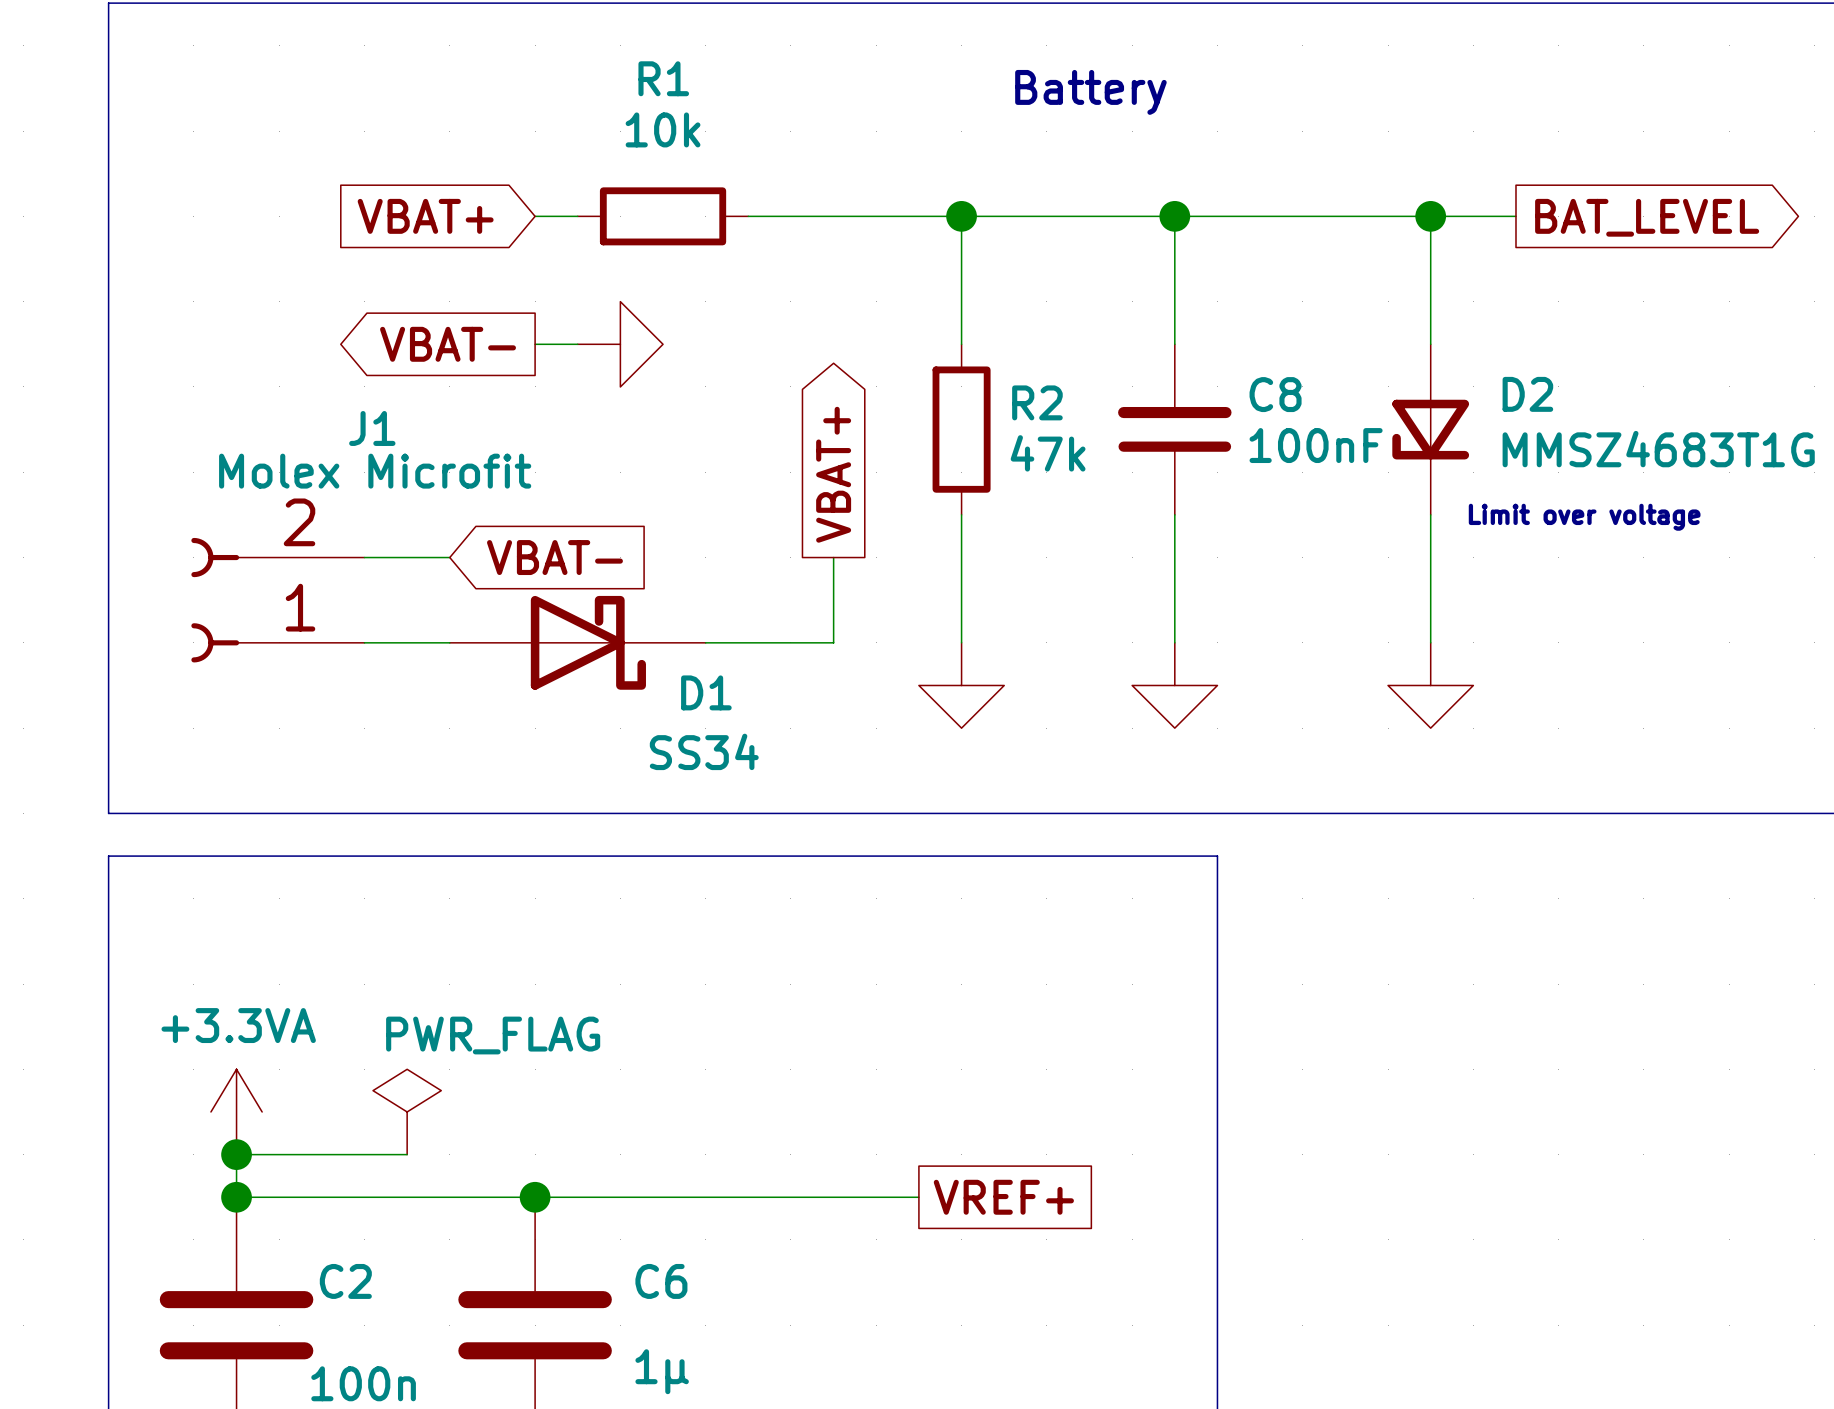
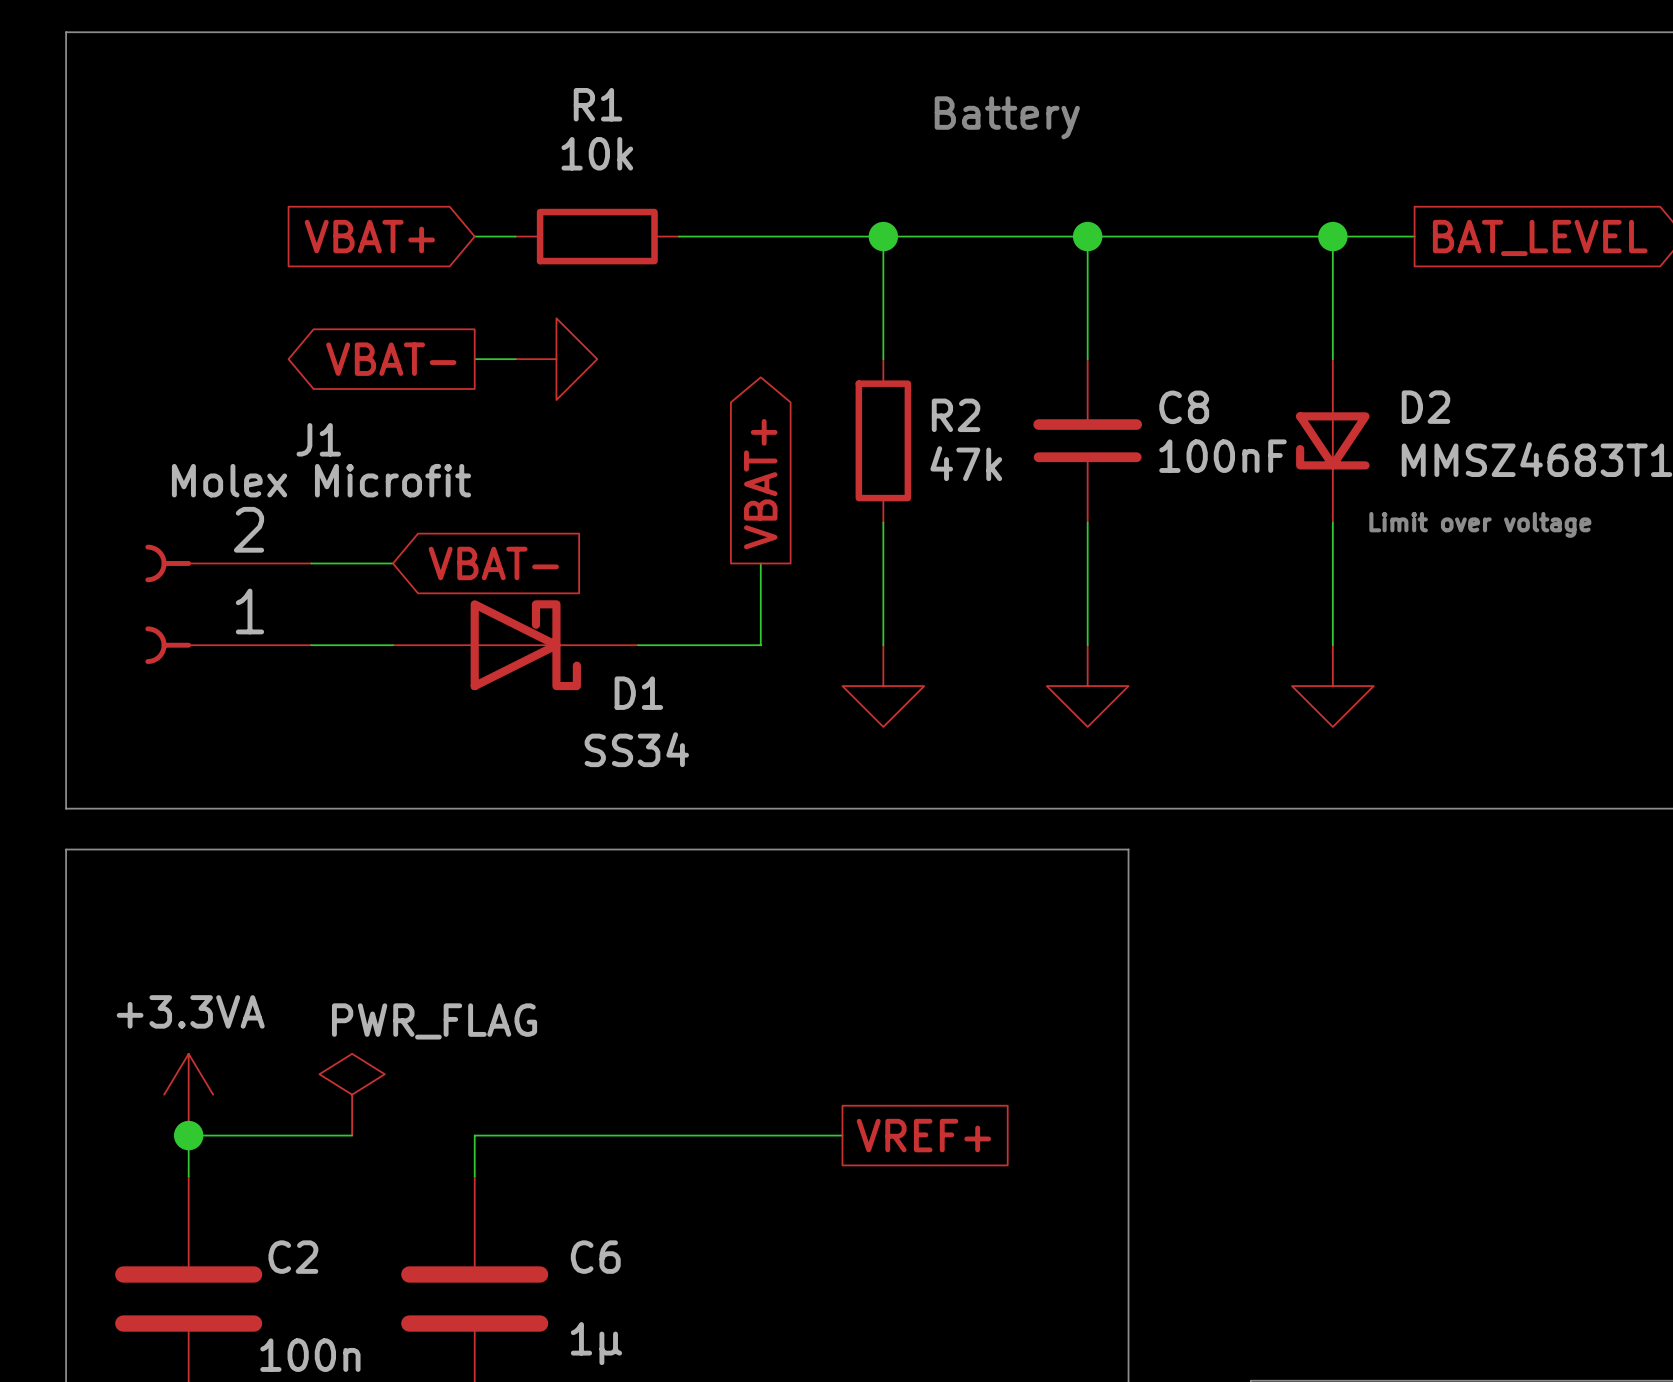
wire: none -> (842, 1135) (474, 1135) (474, 1176)
wire: (236, 1197) (918, 1197) -> none
junction: (236, 1197) -> none
junction: (535, 1197) -> none
global label position: VREF+ (1003, 1197) -> VREF+ (923, 1135)

